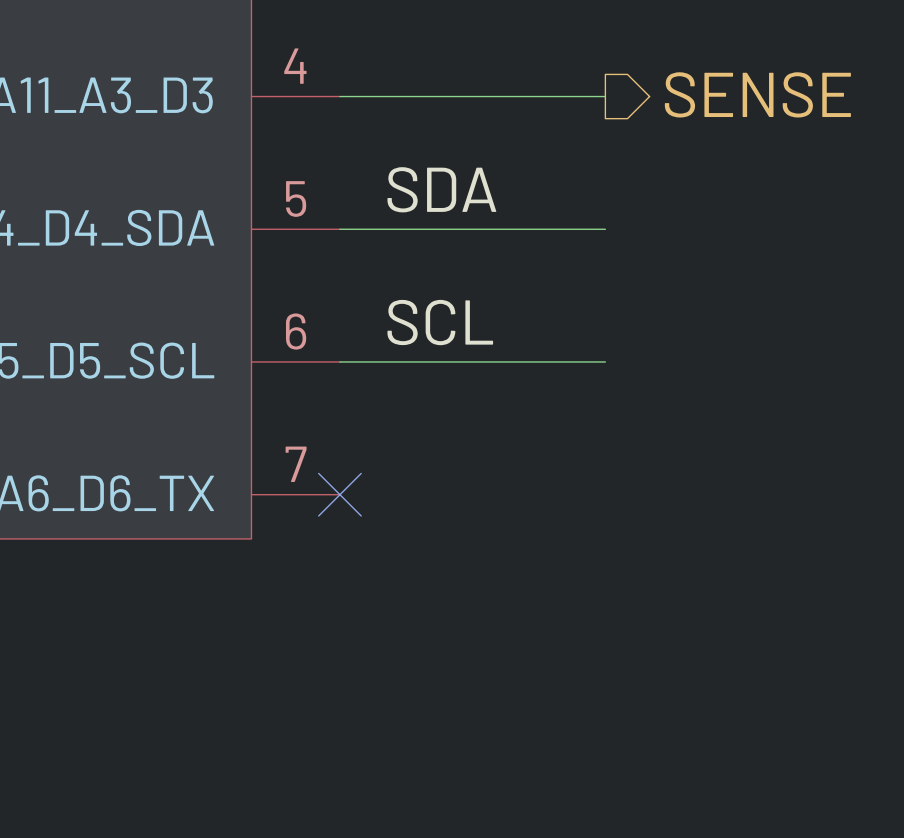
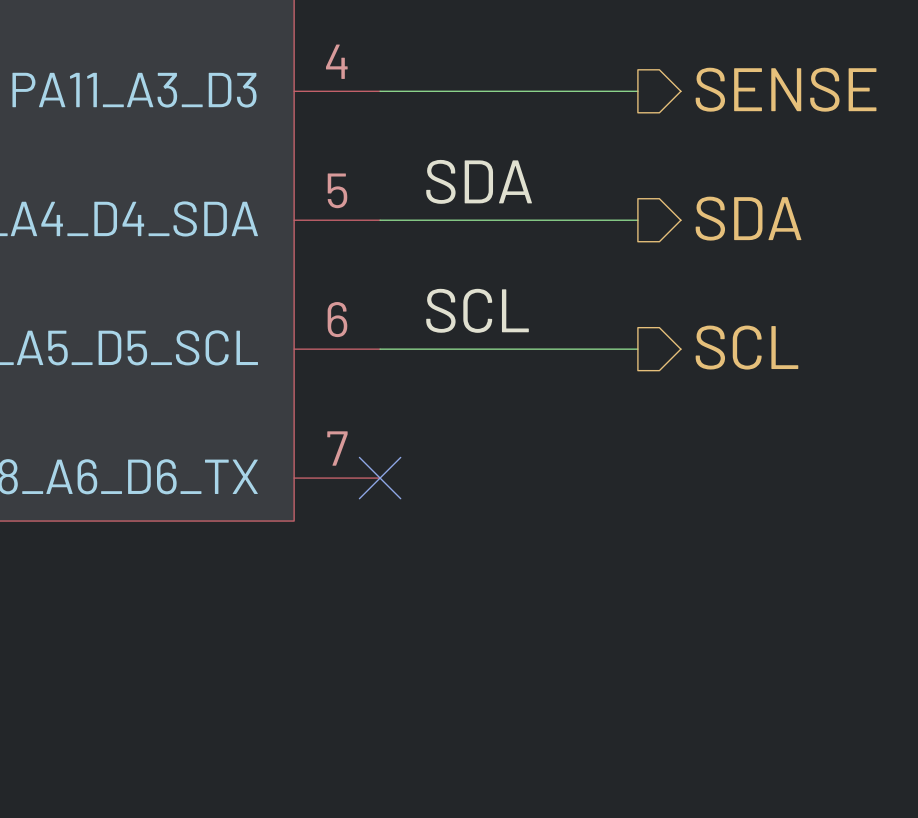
hierarchical label: none -> SDA (748, 218)
hierarchical label: none -> SCL (746, 347)

